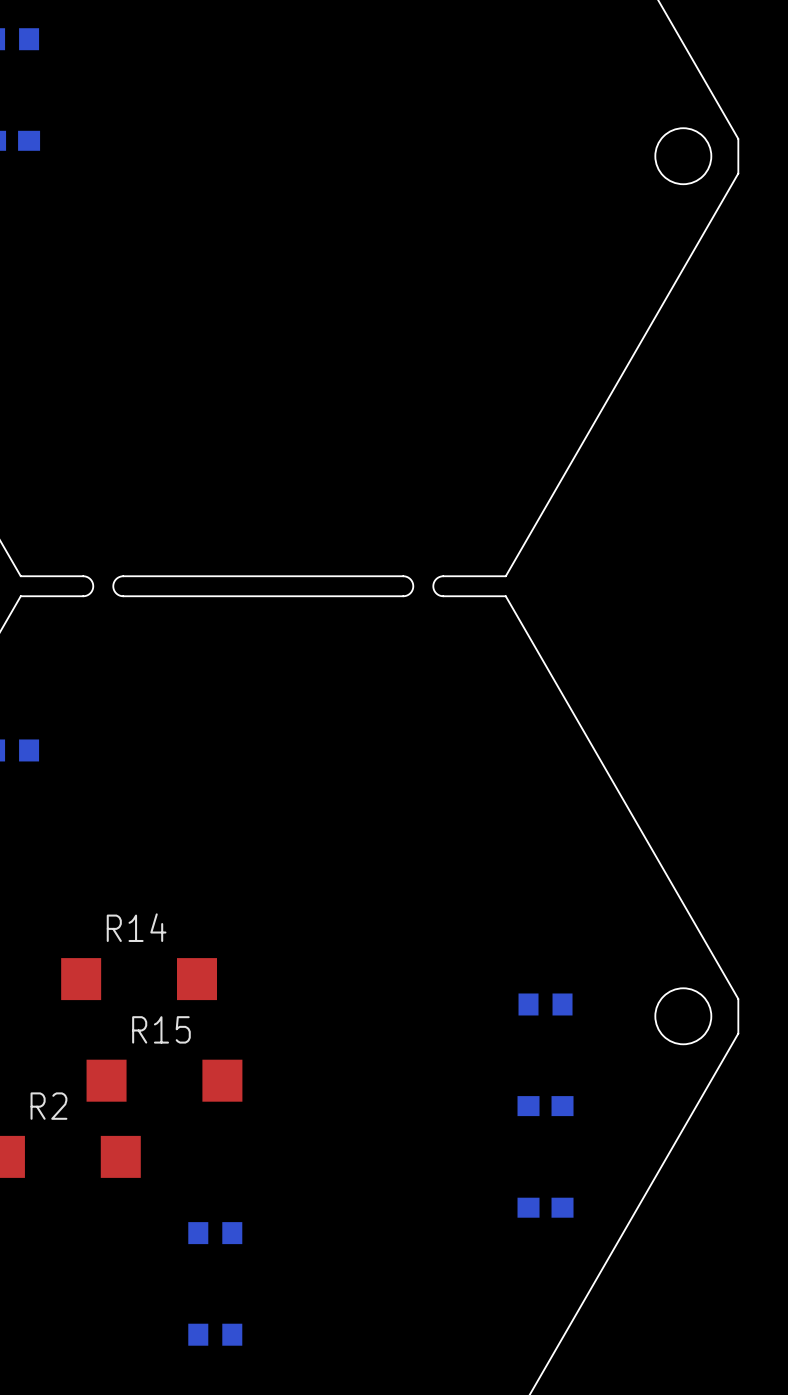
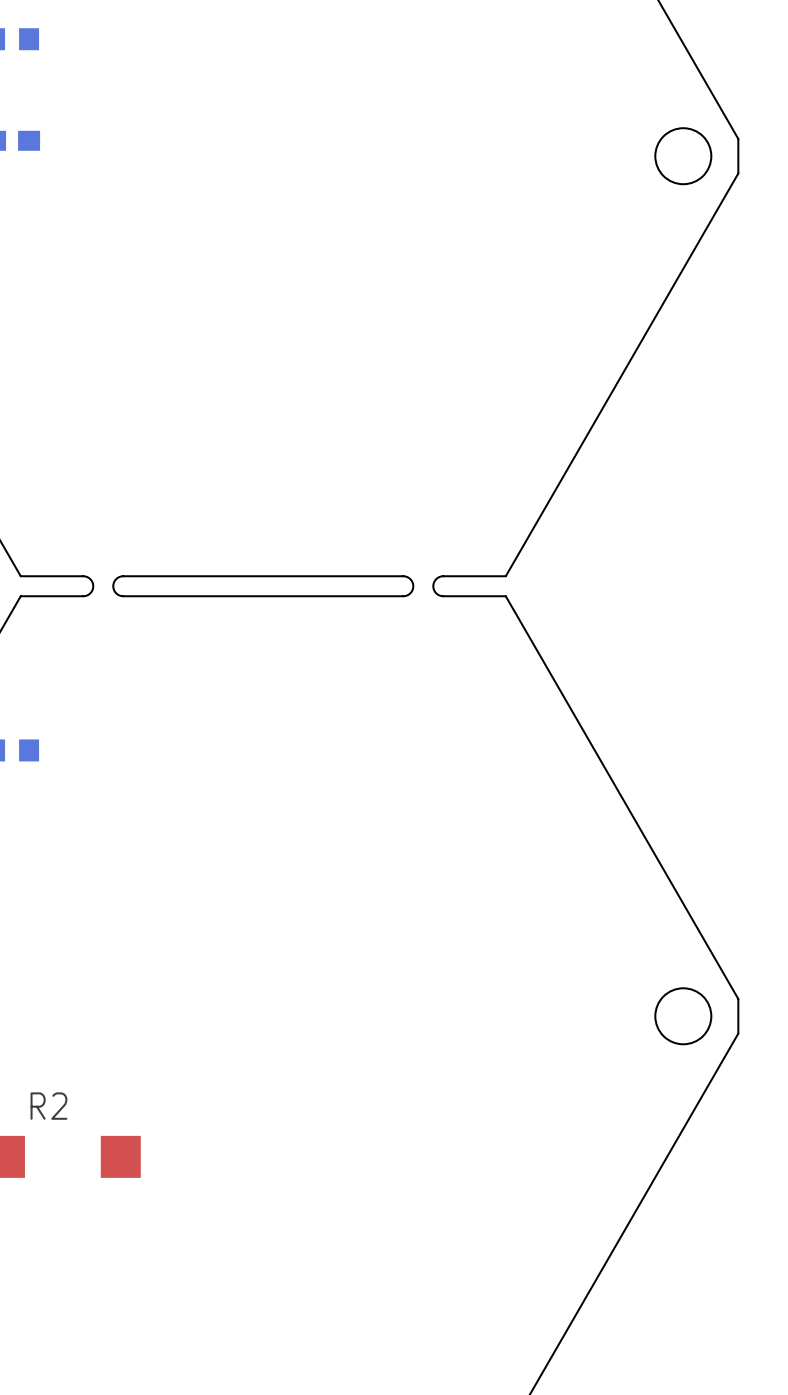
R14: (139, 979) -> none
part: (545, 1004) -> none
R15: (164, 1080) -> none
part: (545, 1106) -> none
part: (545, 1207) -> none
part: (215, 1233) -> none
part: (215, 1334) -> none

